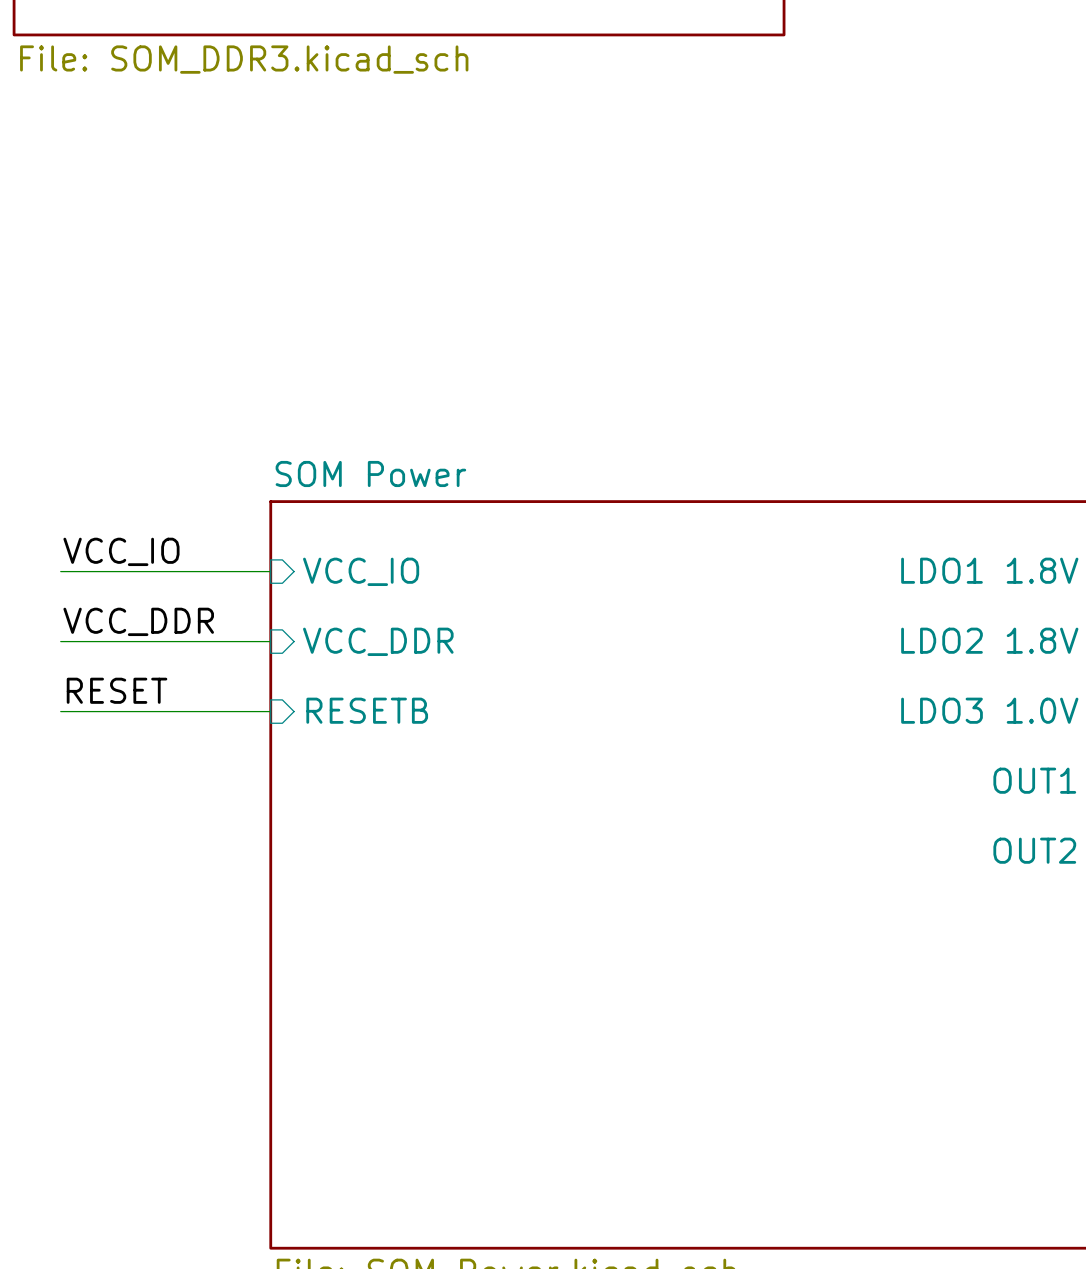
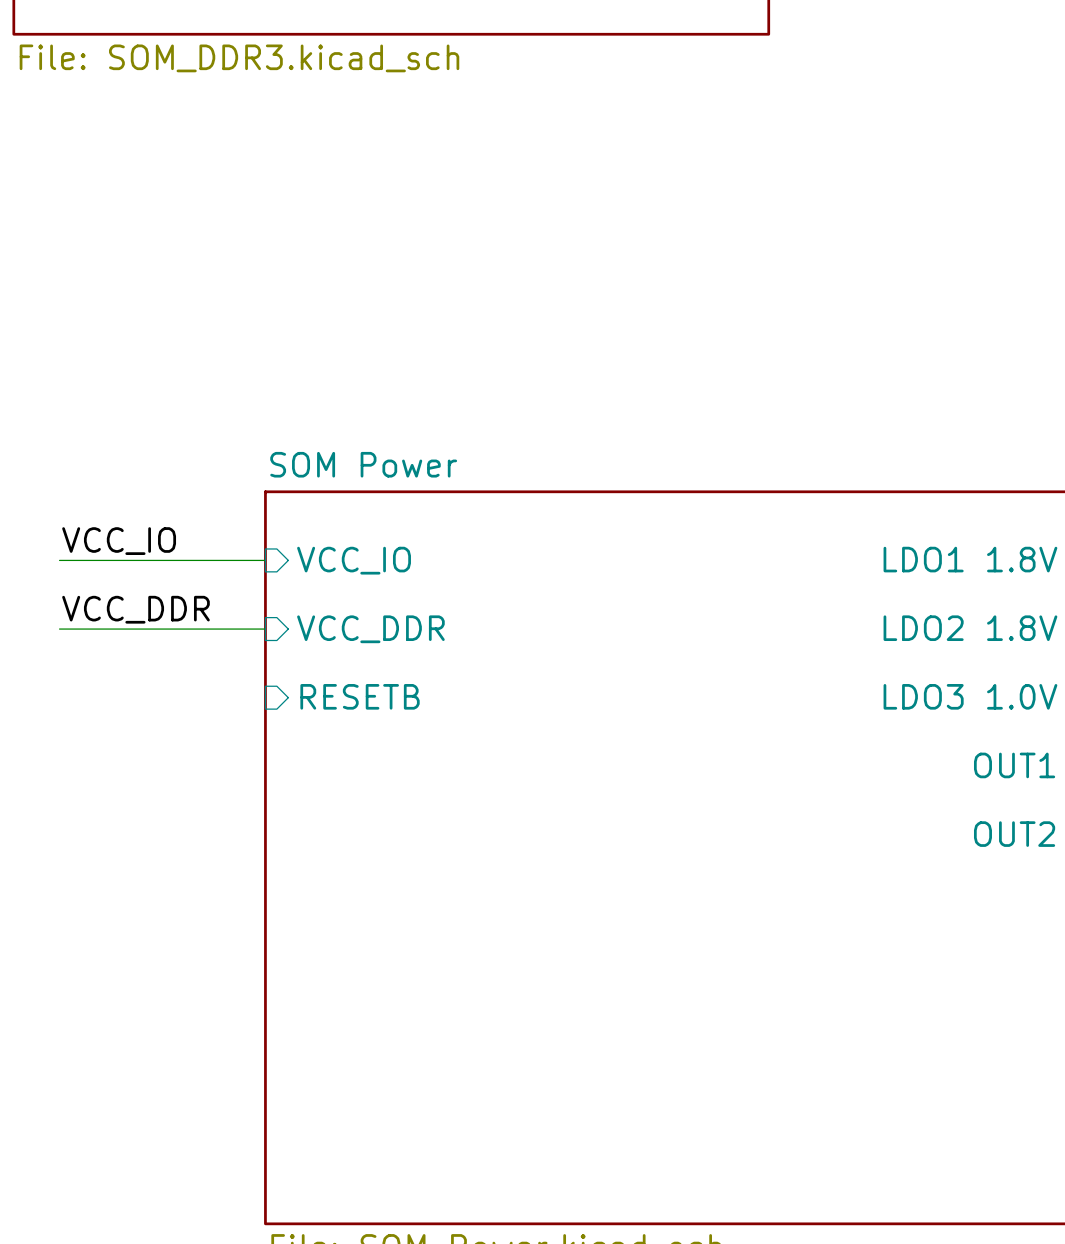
label: RESET (117, 690) -> none
wire: (60, 711) (270, 711) -> none

